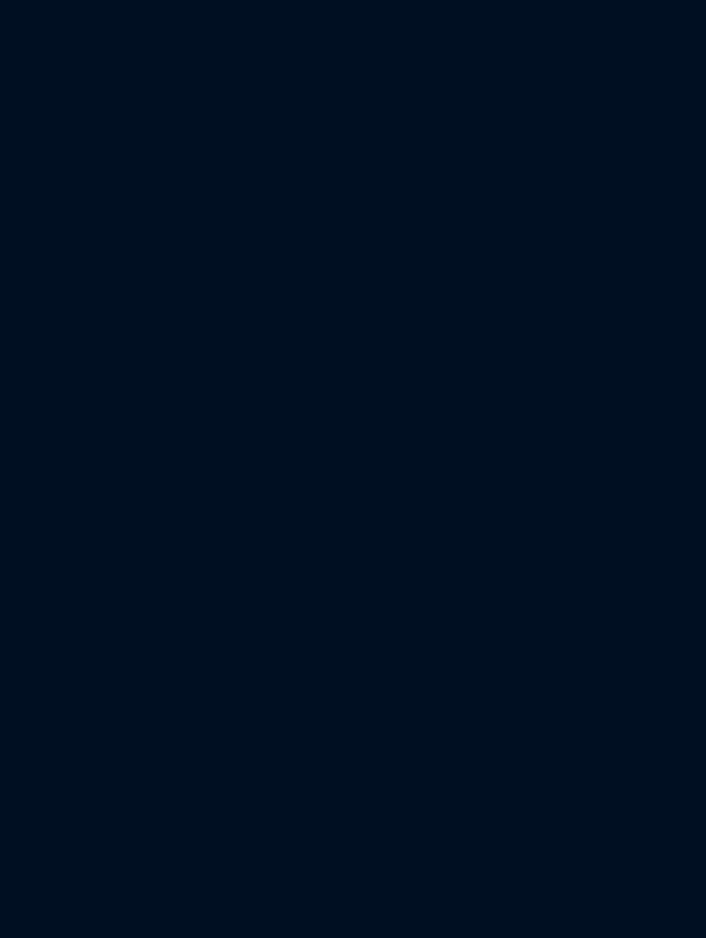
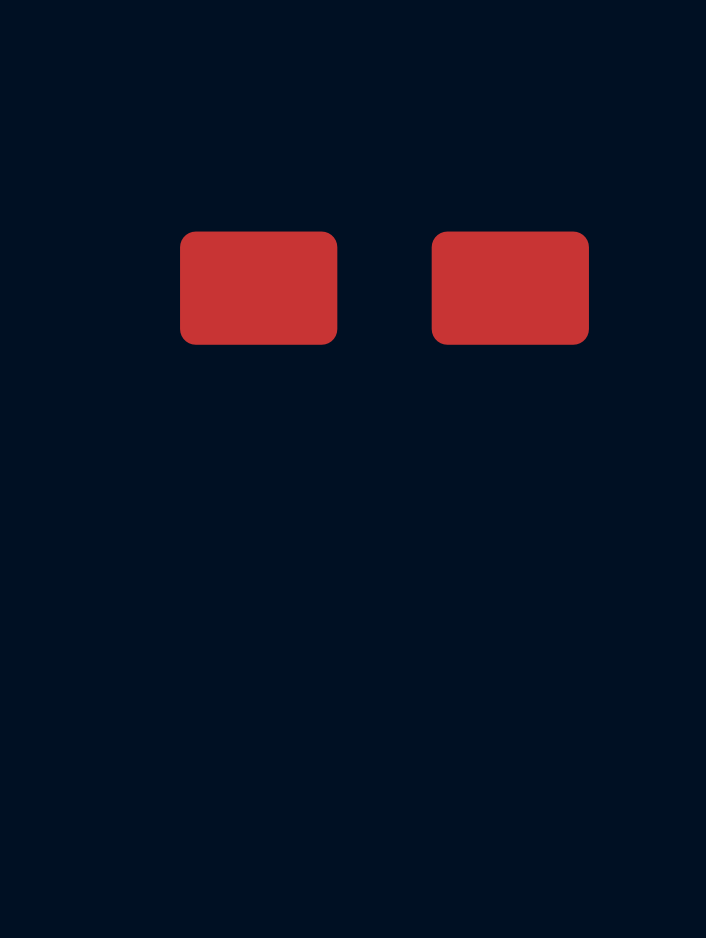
part: none -> (384, 288)

